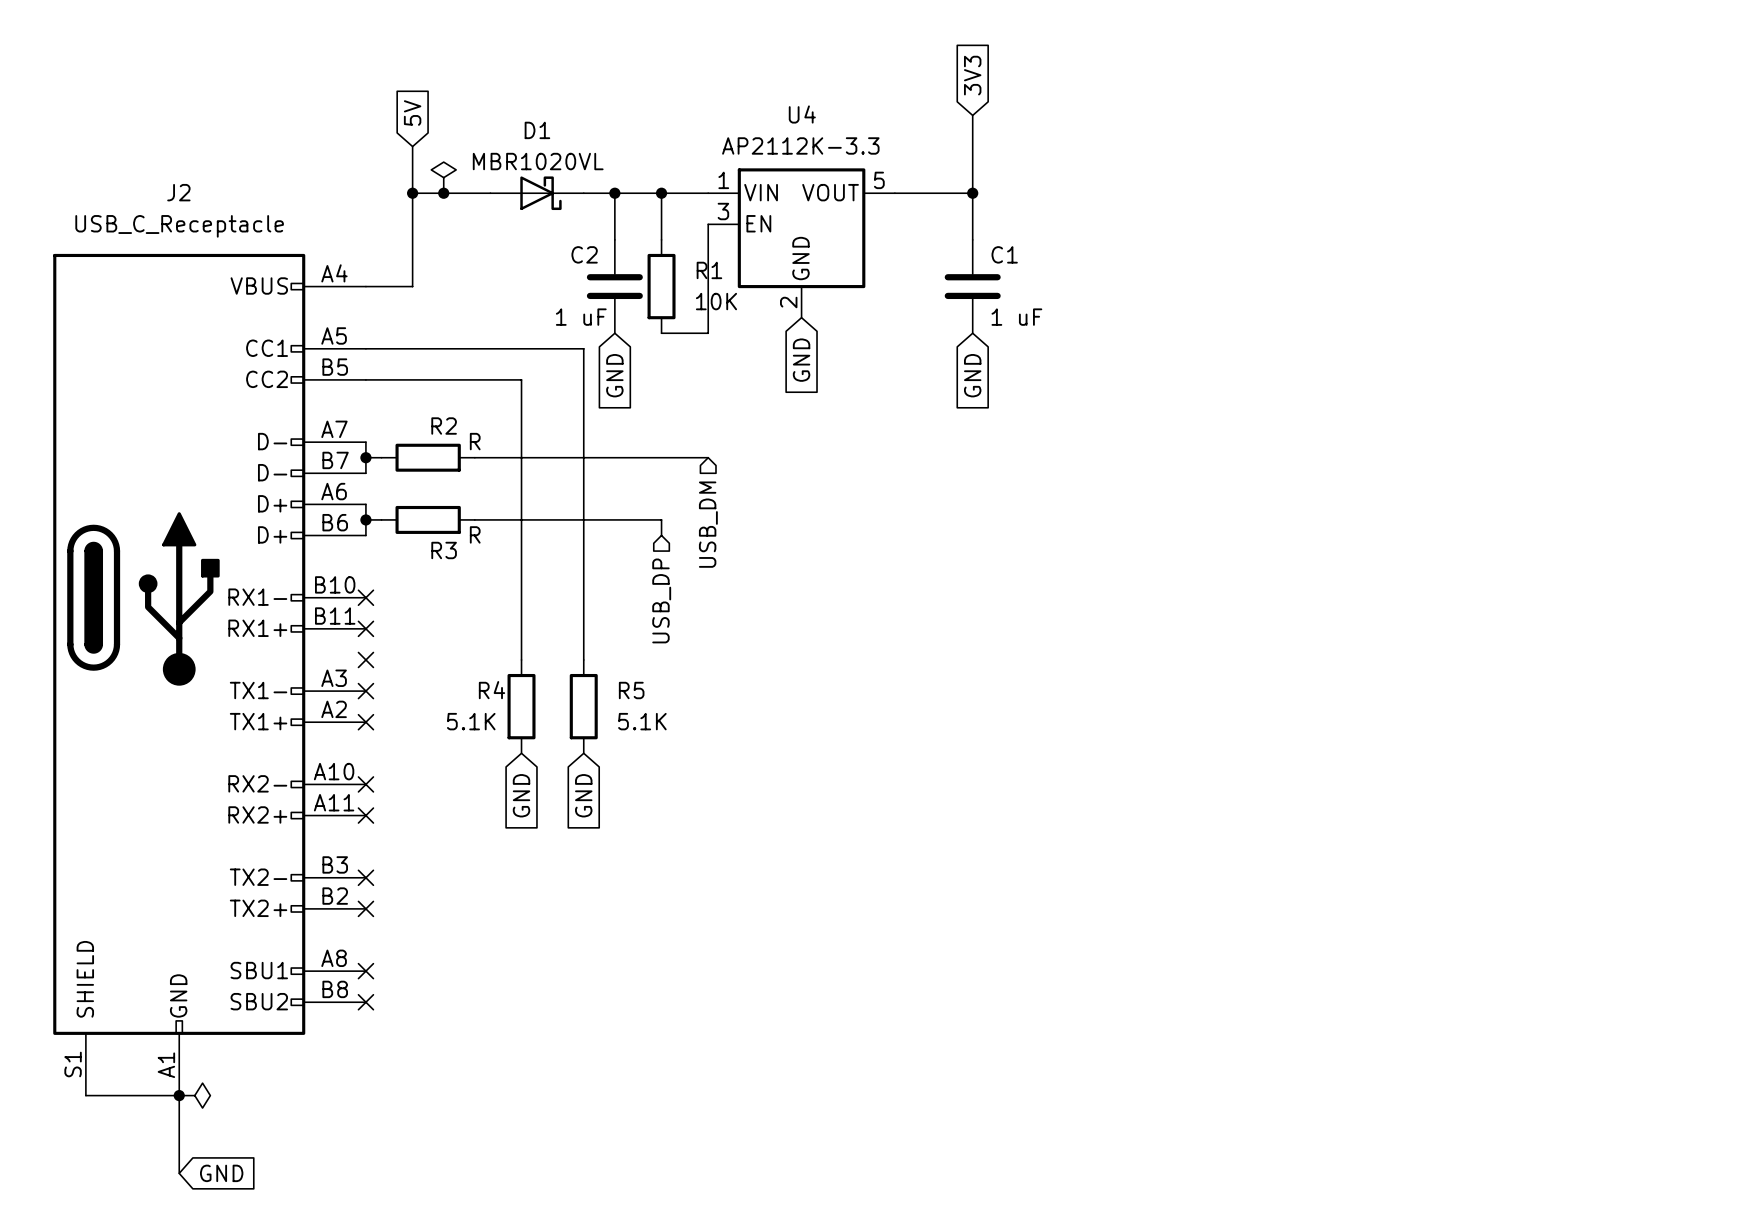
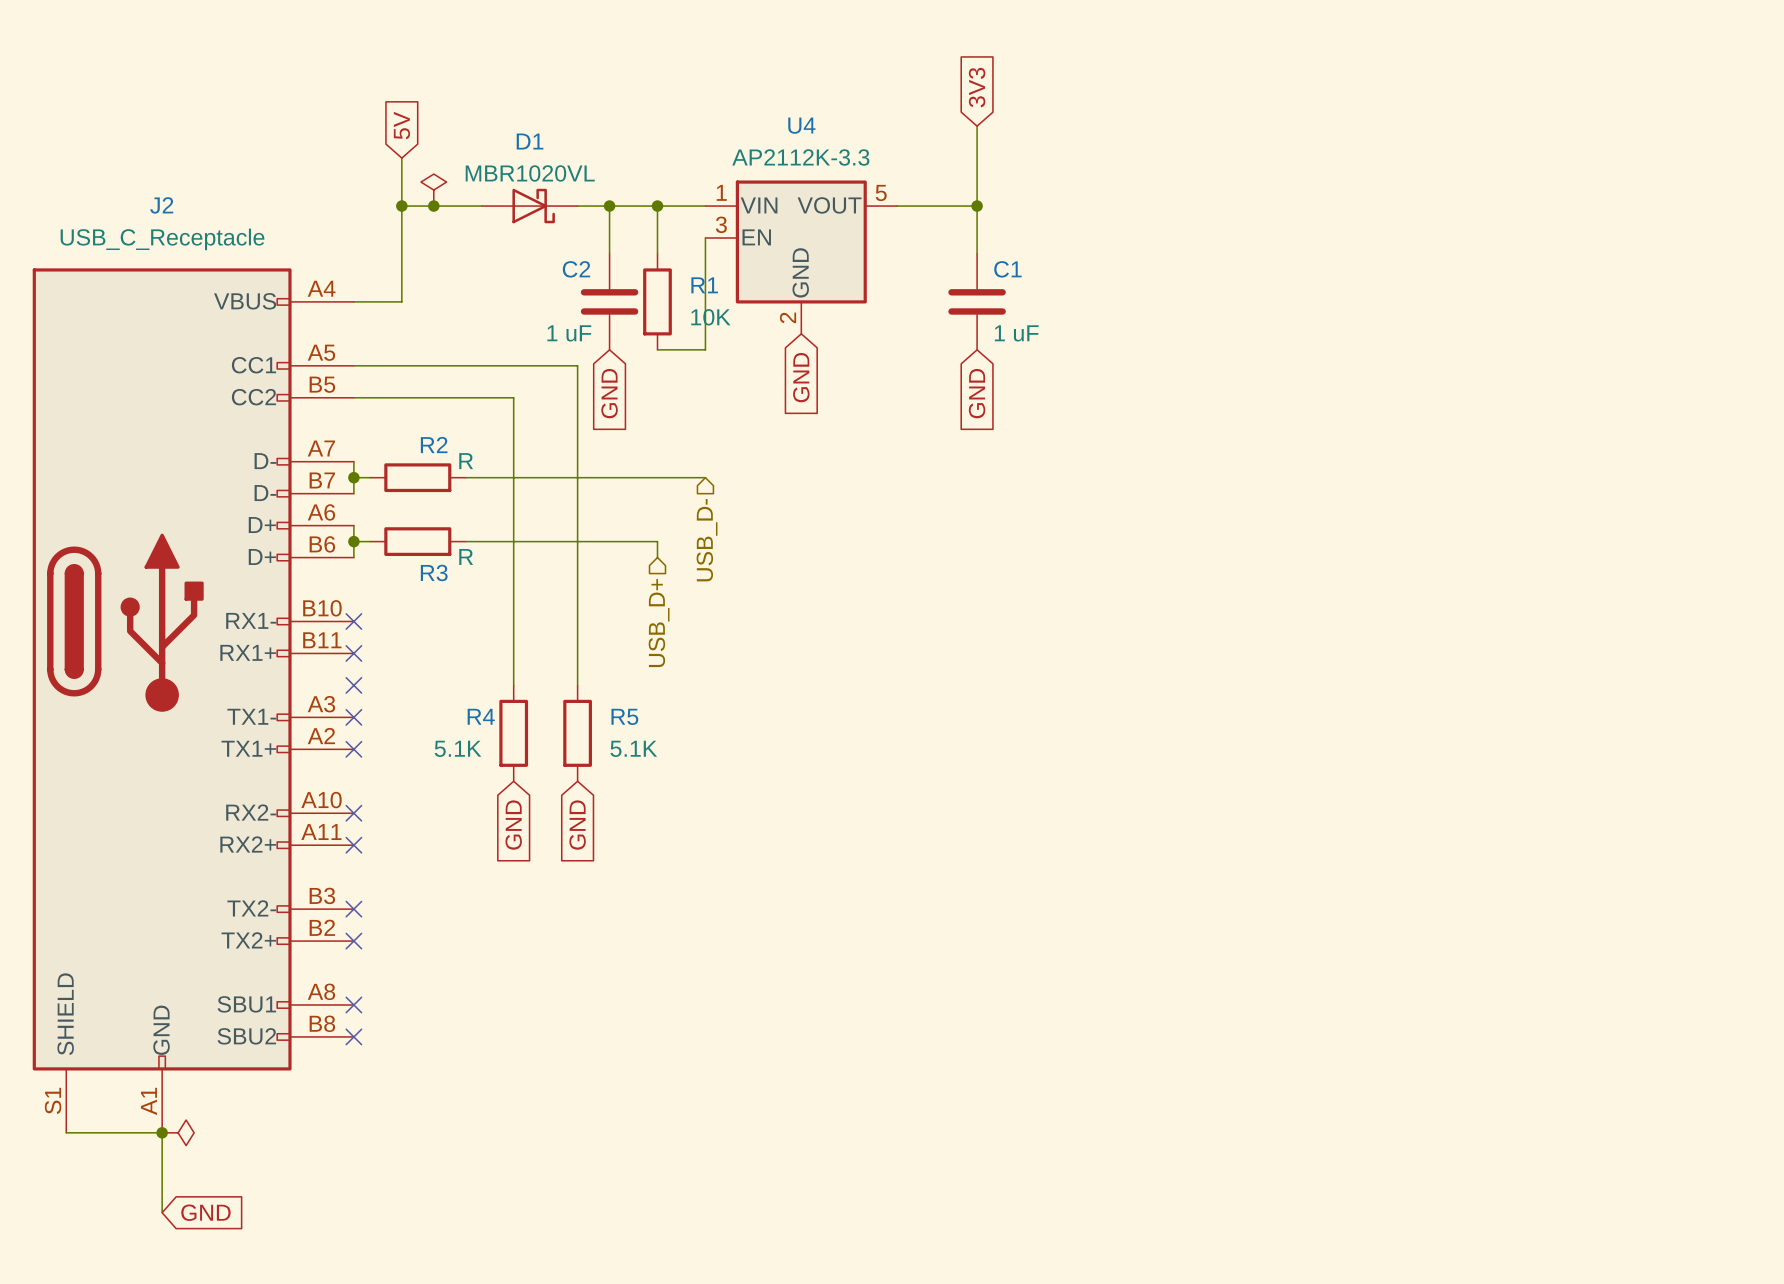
hierarchical label: USB_DM (708, 524) -> USB_D- (707, 540)
hierarchical label: USB_DP (661, 600) -> USB_D+ (659, 623)

